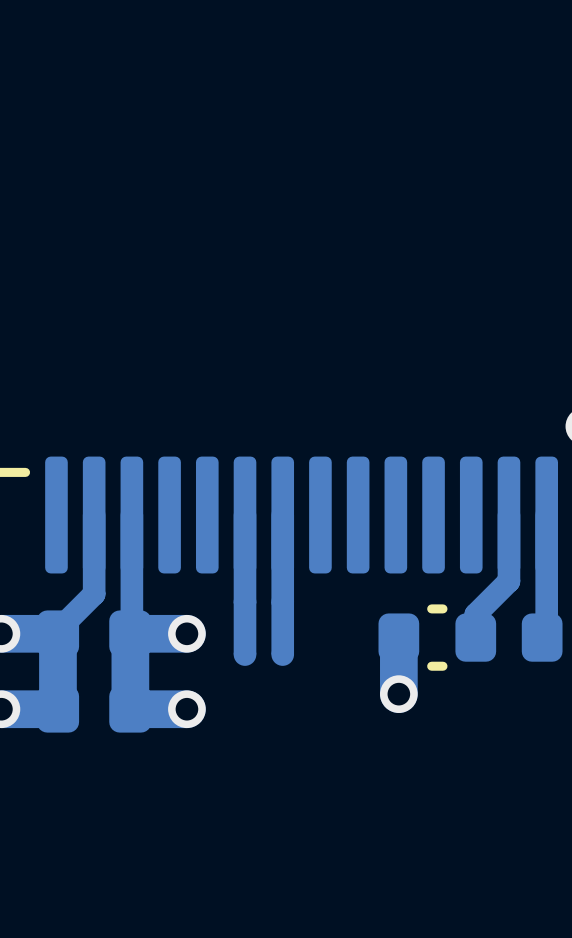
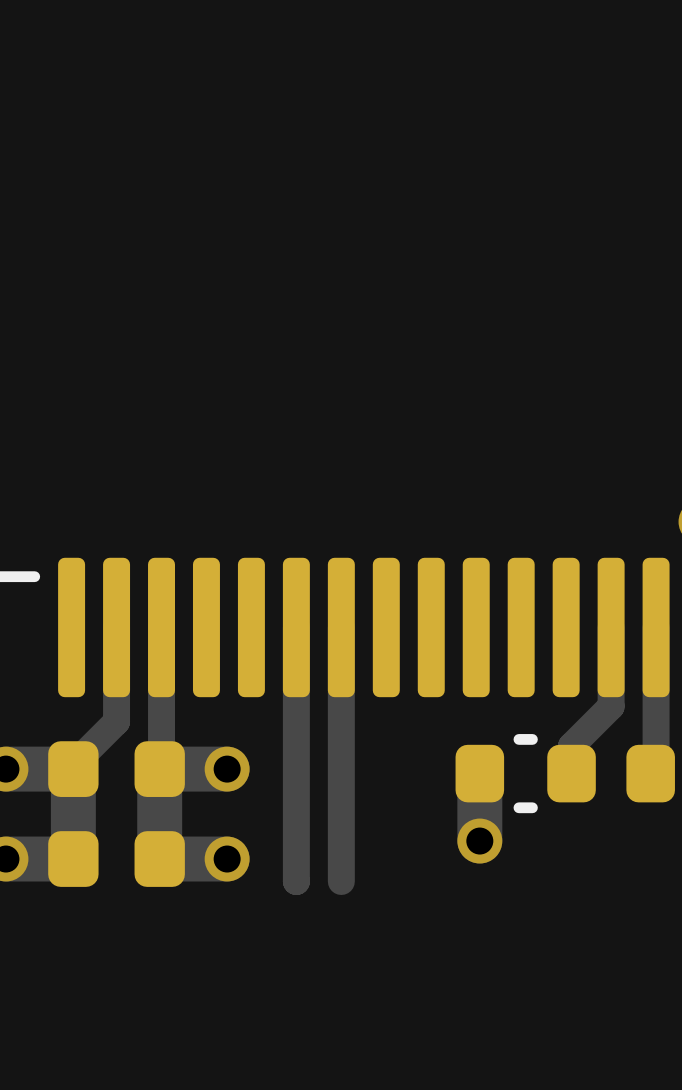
track: none -> (296, 730) (296, 881)
track: none -> (341, 730) (341, 881)
part: (245, 628) -> none
part: (282, 628) -> none

